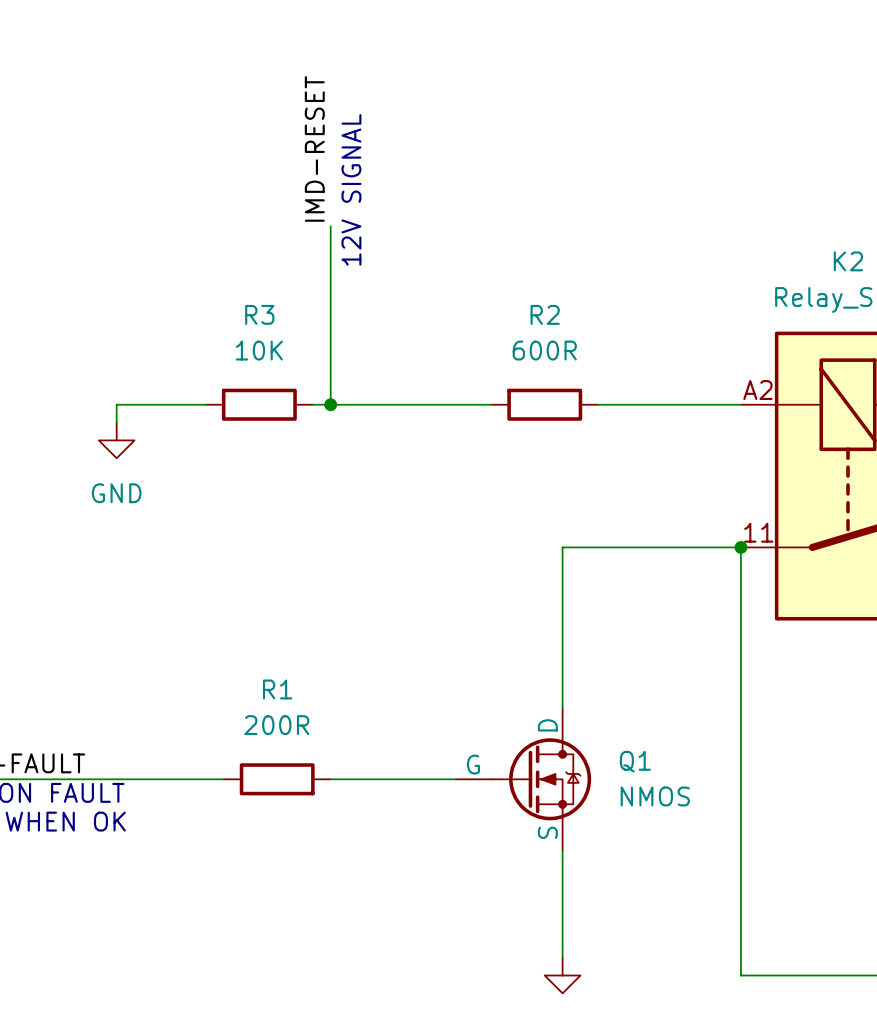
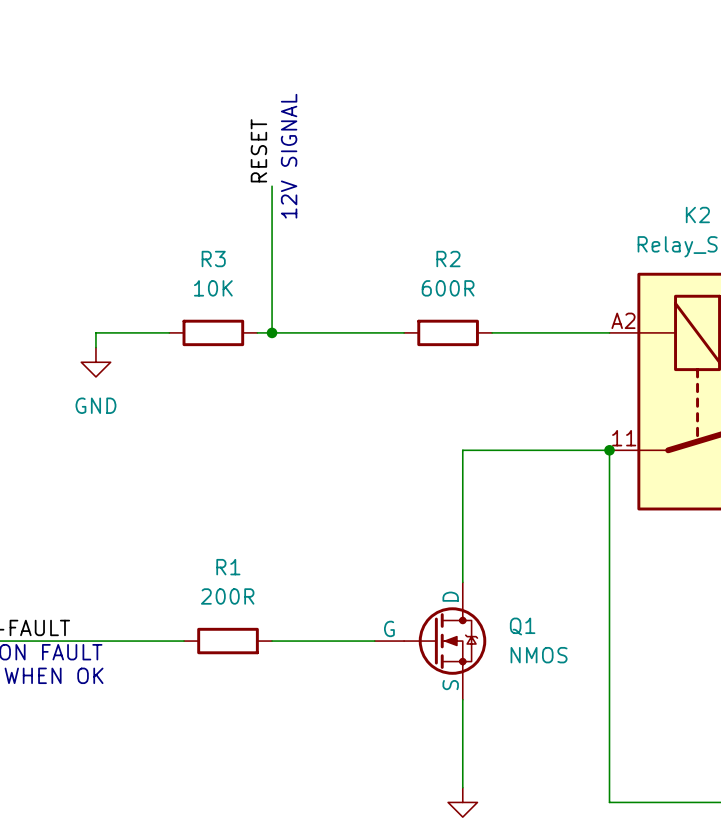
label: IMD-RESET (314, 148) -> RESET (258, 150)

